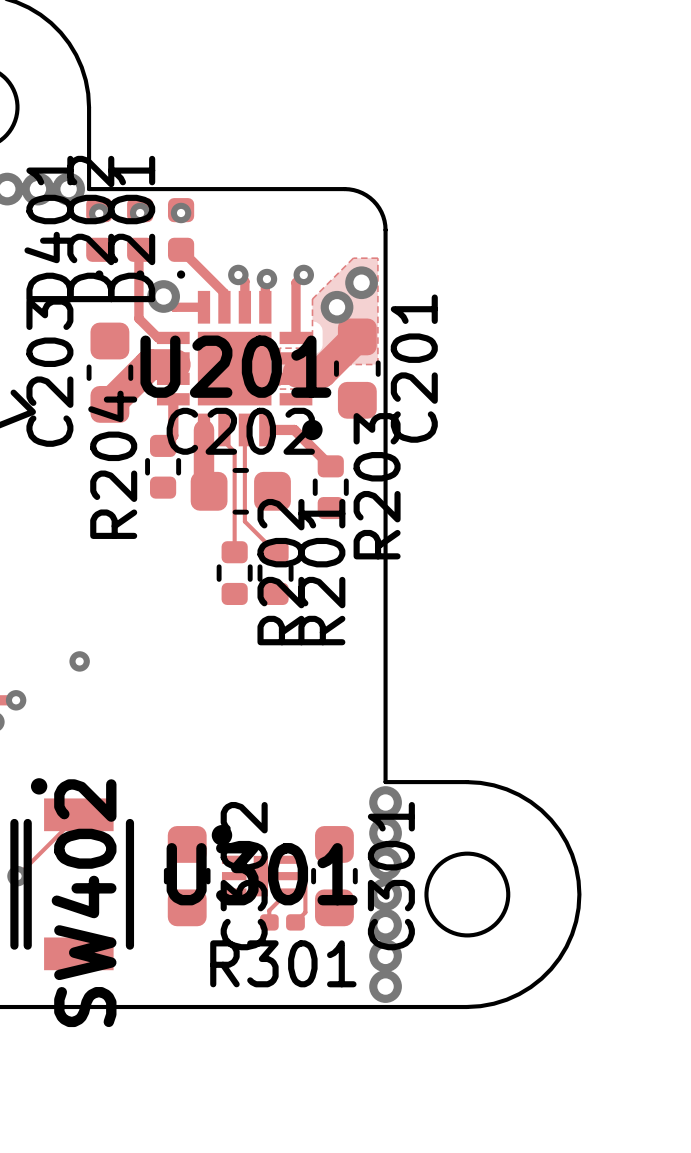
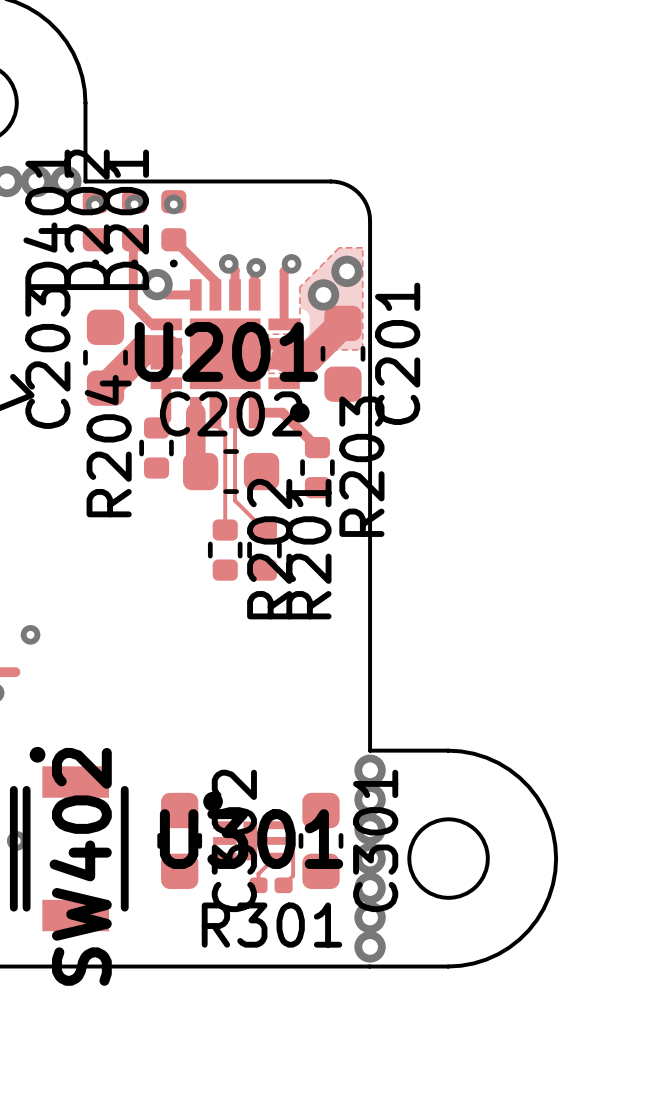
via: none -> (30, 634)
via: (79, 661) -> none
via: (16, 700) -> none
track: (78, 814) (17, 876) -> none

